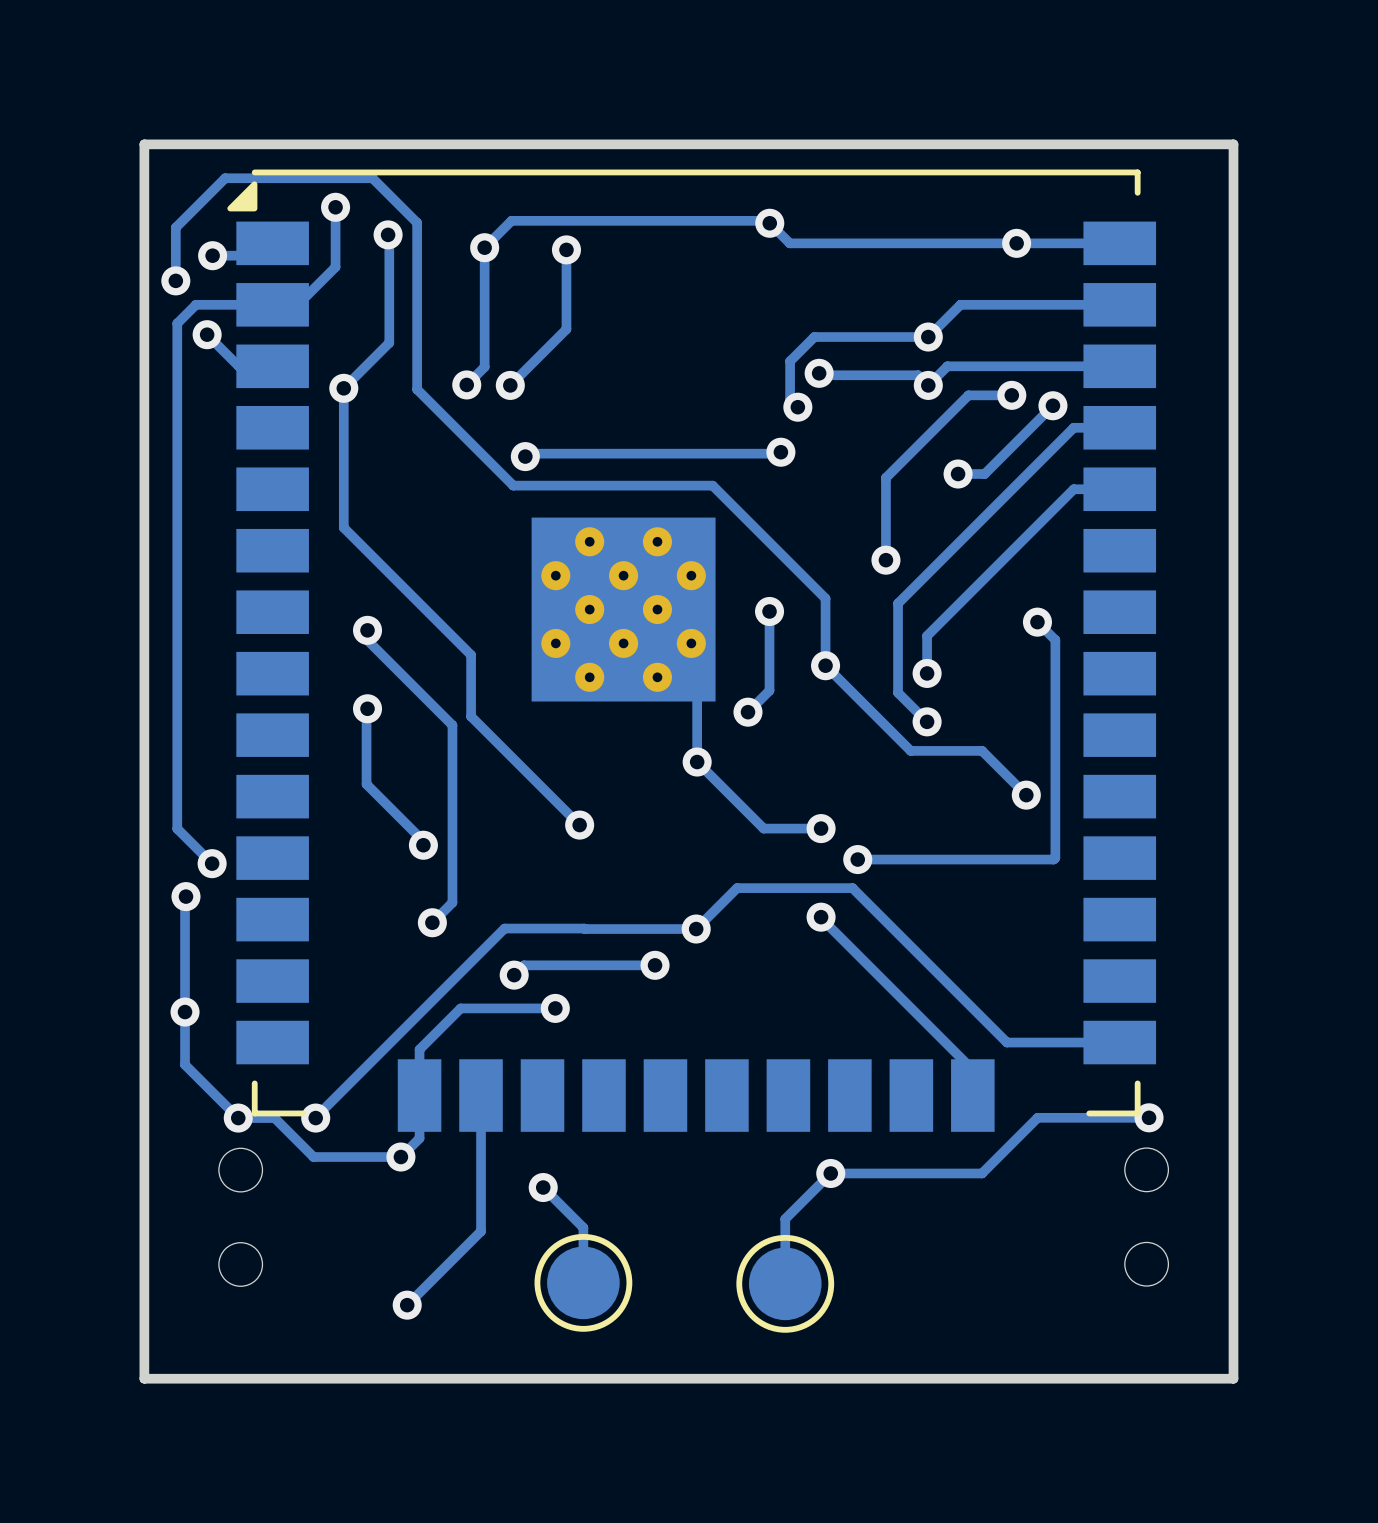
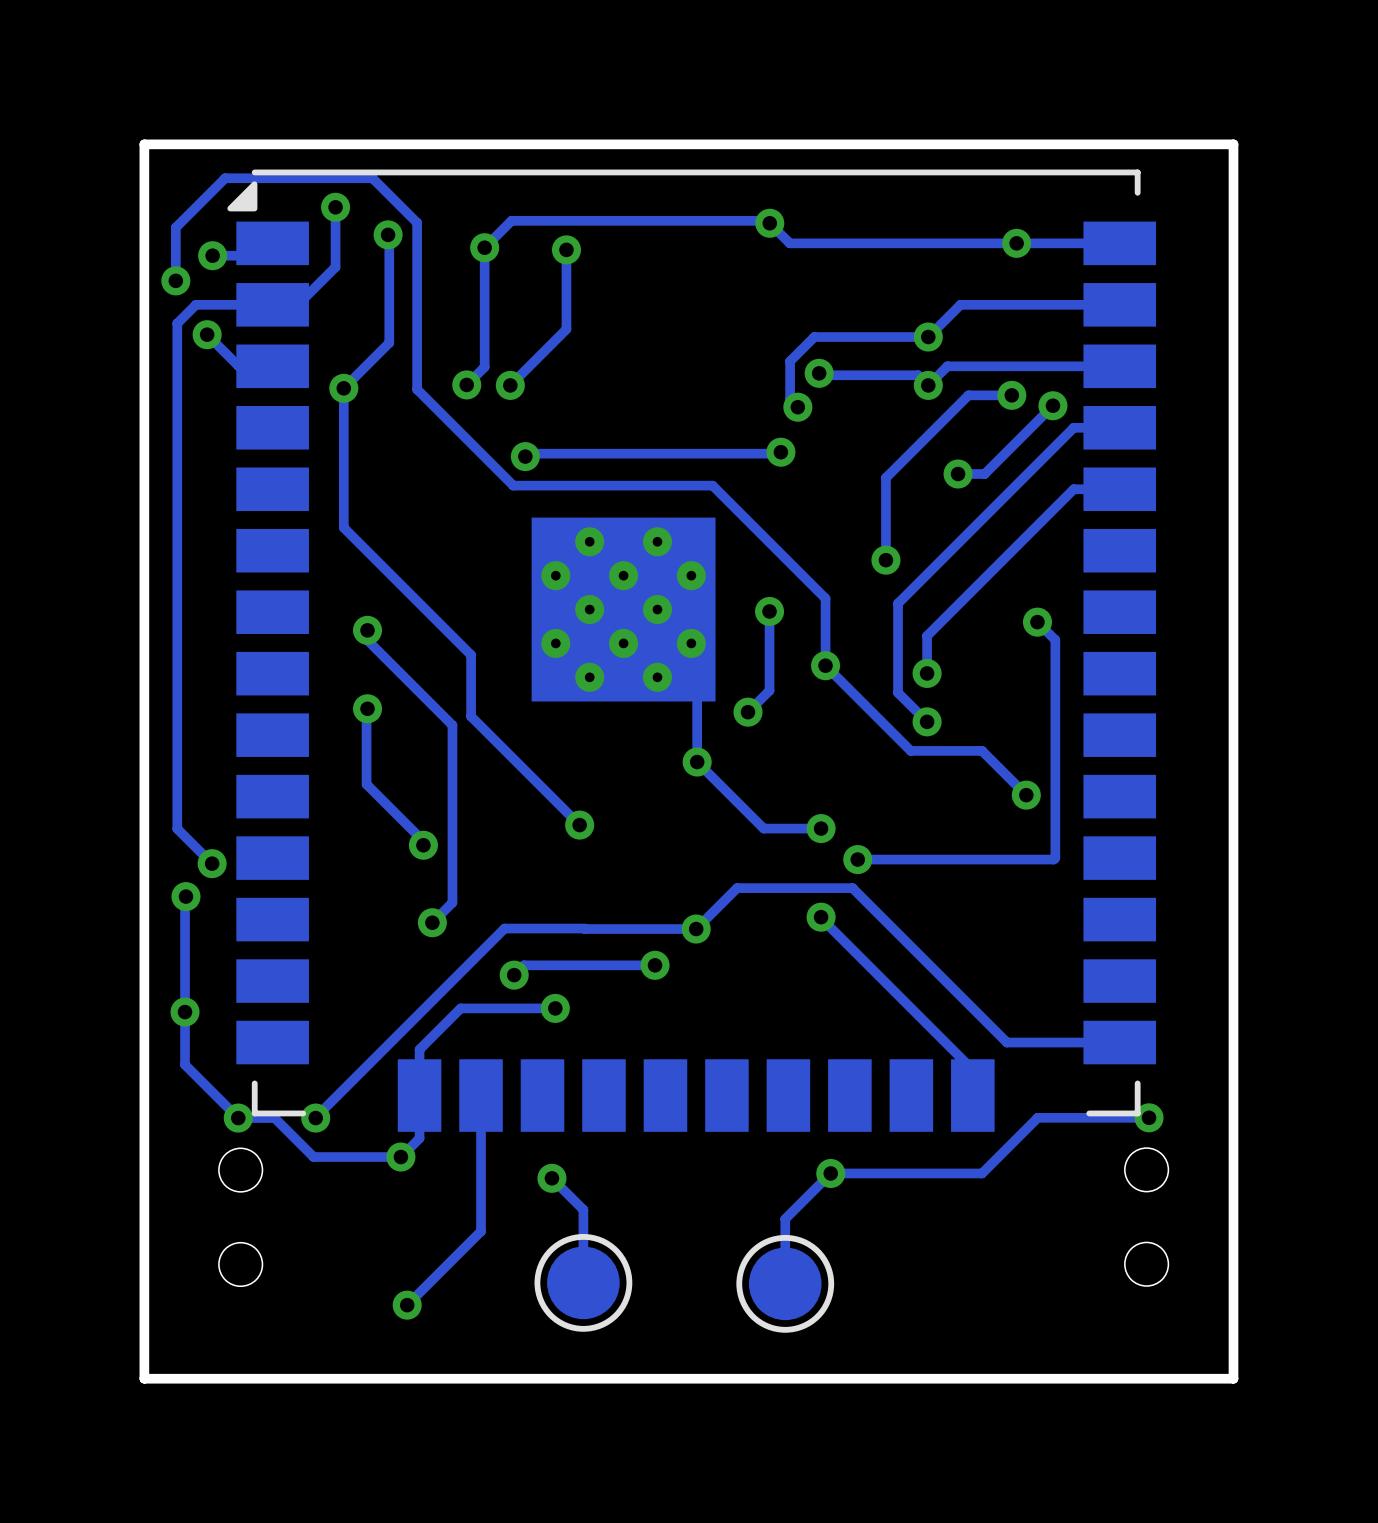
track: (543, 1187) (583, 1227) -> (551, 1178) (583, 1209) (583, 1227)
via position: (543, 1187) -> (551, 1178)

